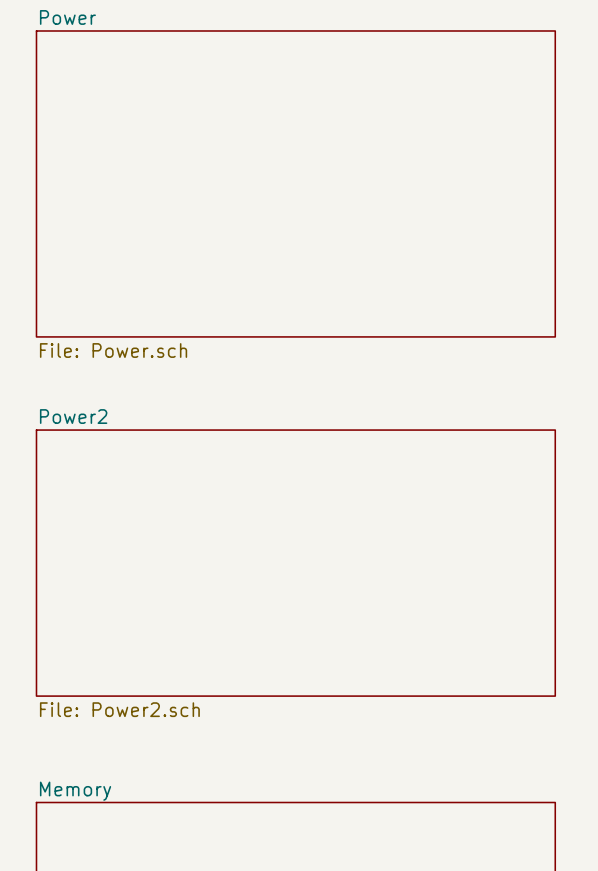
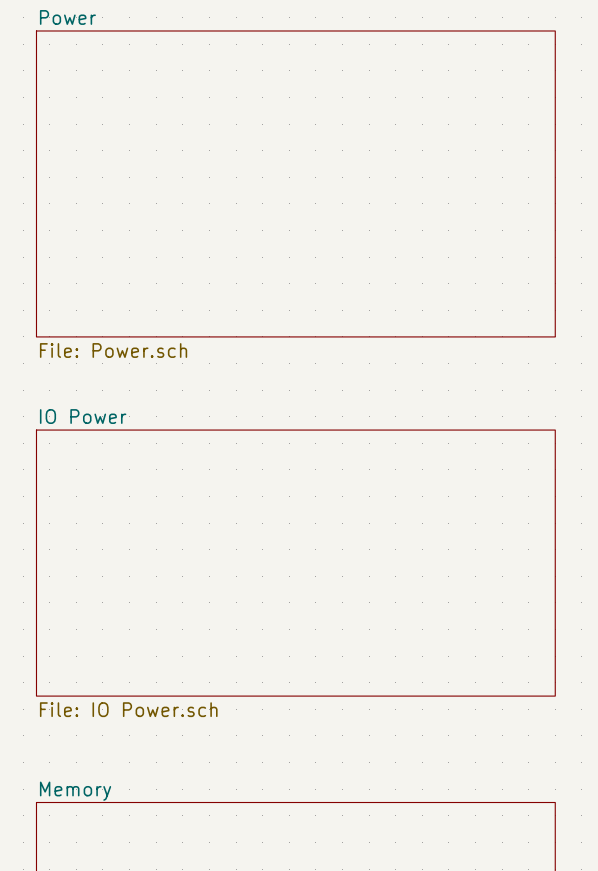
sheet Power2 name: Power2 (73, 416) -> IO Power (83, 416)
sheet Power2 value: File: Power2.sch (119, 709) -> File: IO Power.sch (128, 709)

